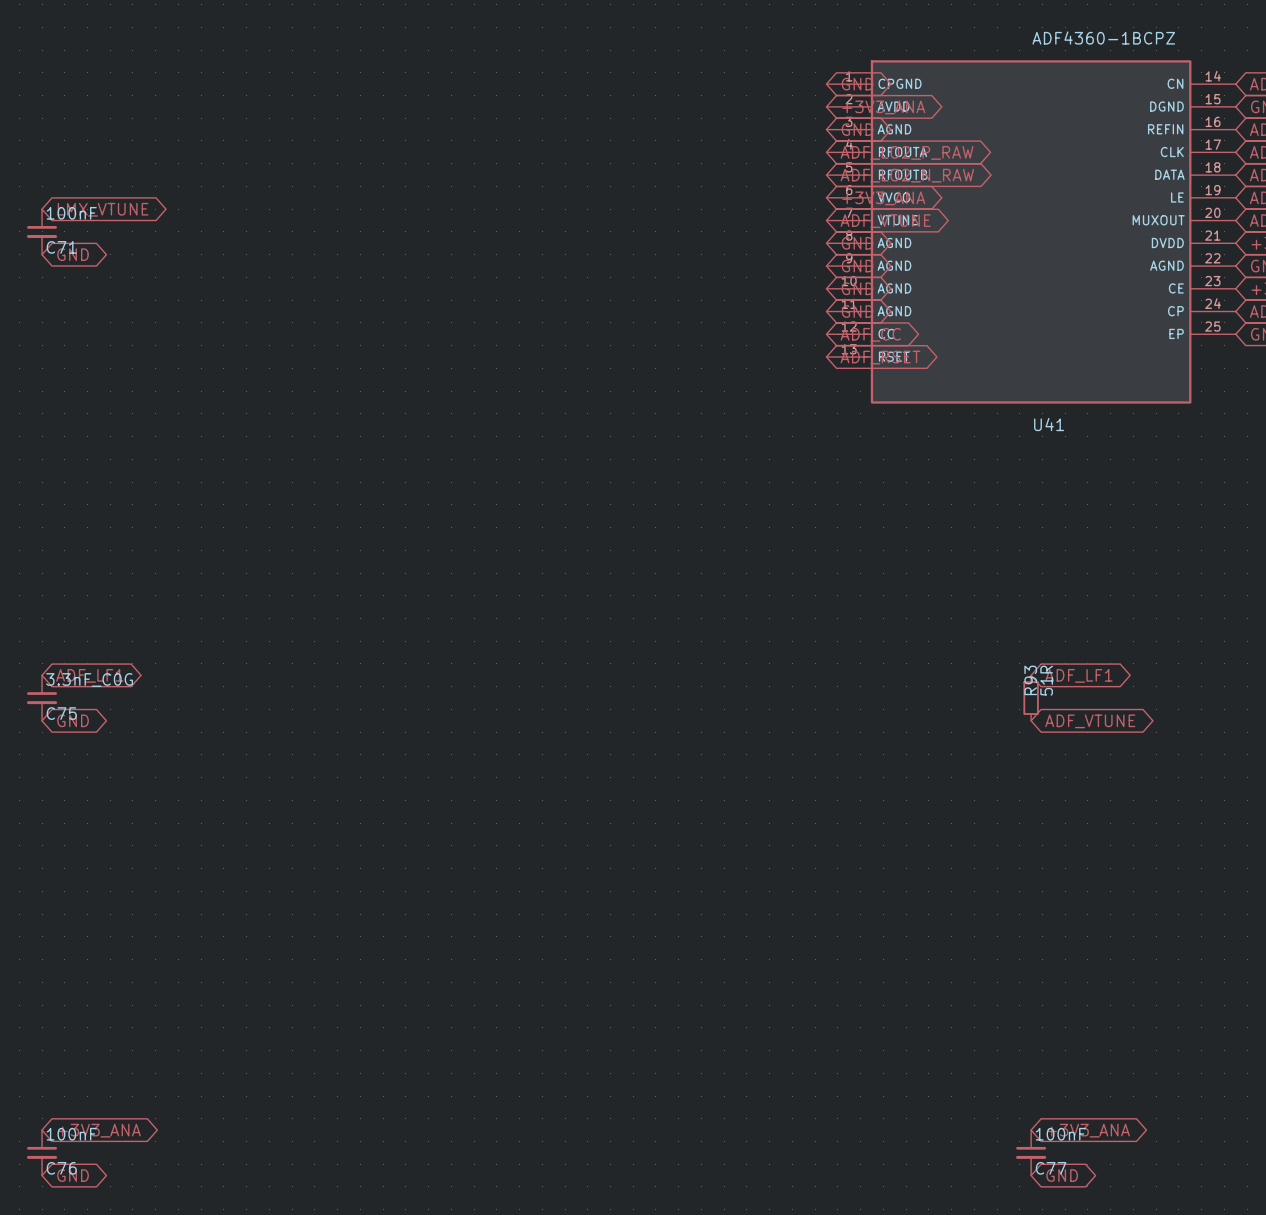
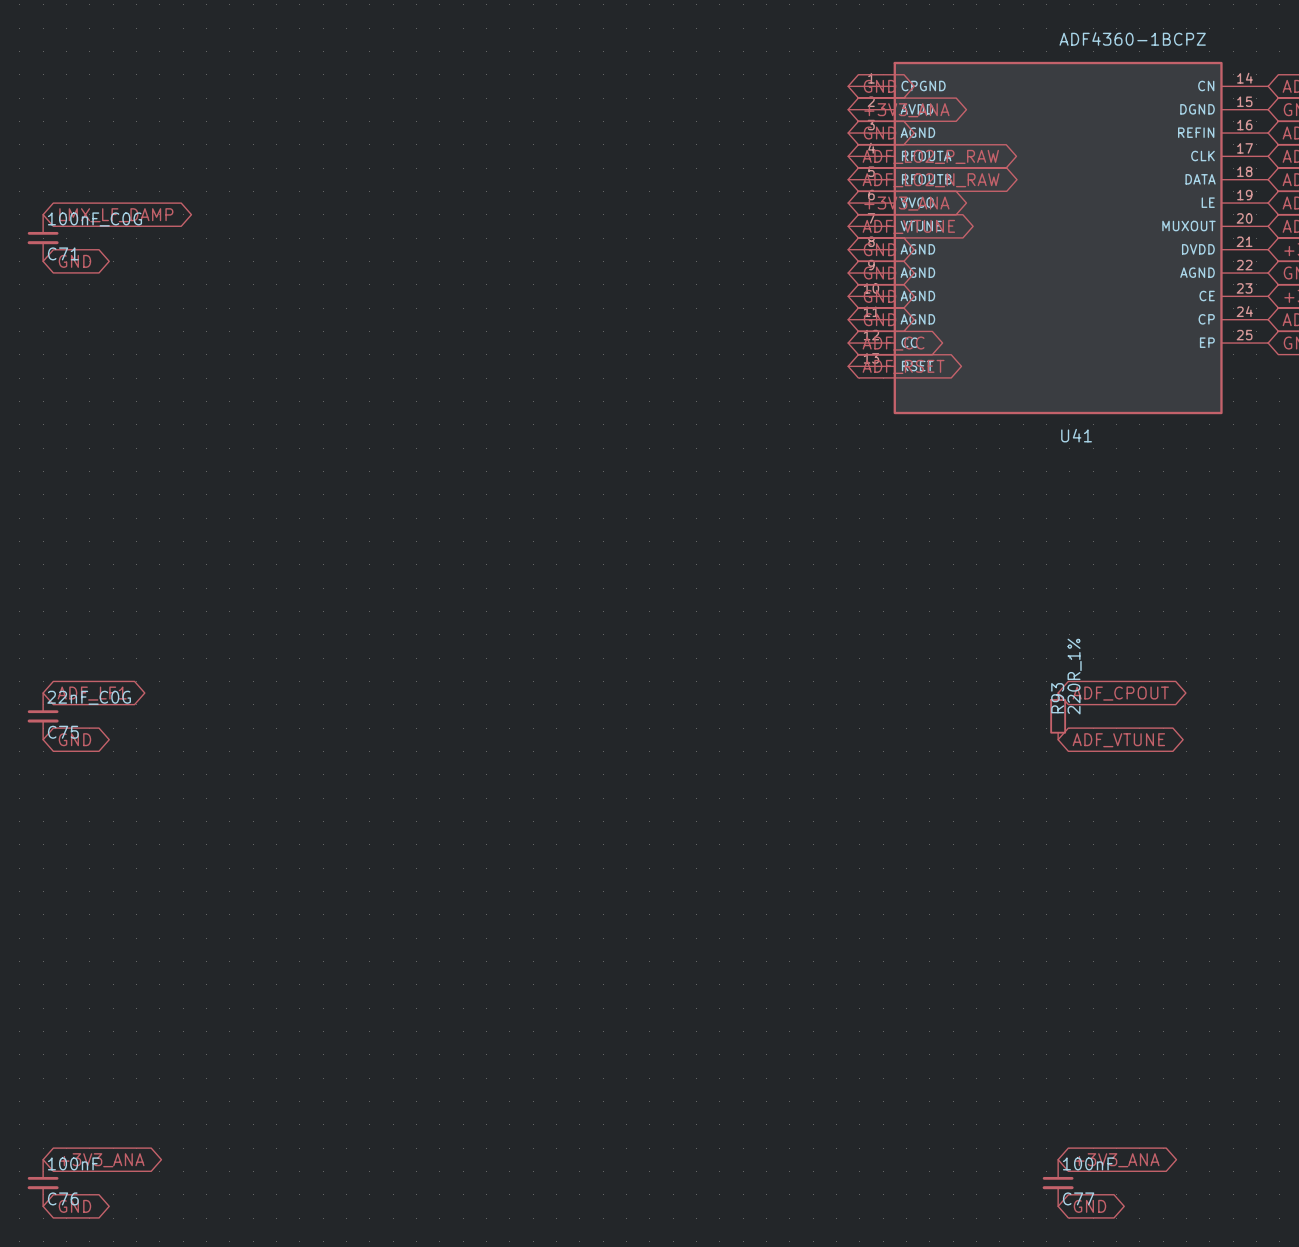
global label: LMX_VTUNE (103, 209) -> LMX_LF_DAMP (116, 215)
C71 value: 100nF (71, 213) -> 100nF_C0G (94, 219)
global label: ADF_LF1 (1078, 675) -> ADF_CPOUT (1120, 693)
C75 value: 3.3nF_C0G (89, 680) -> 22nF_C0G (89, 697)
R93 value: 51R (1046, 680) -> 220R_1% (1074, 676)

